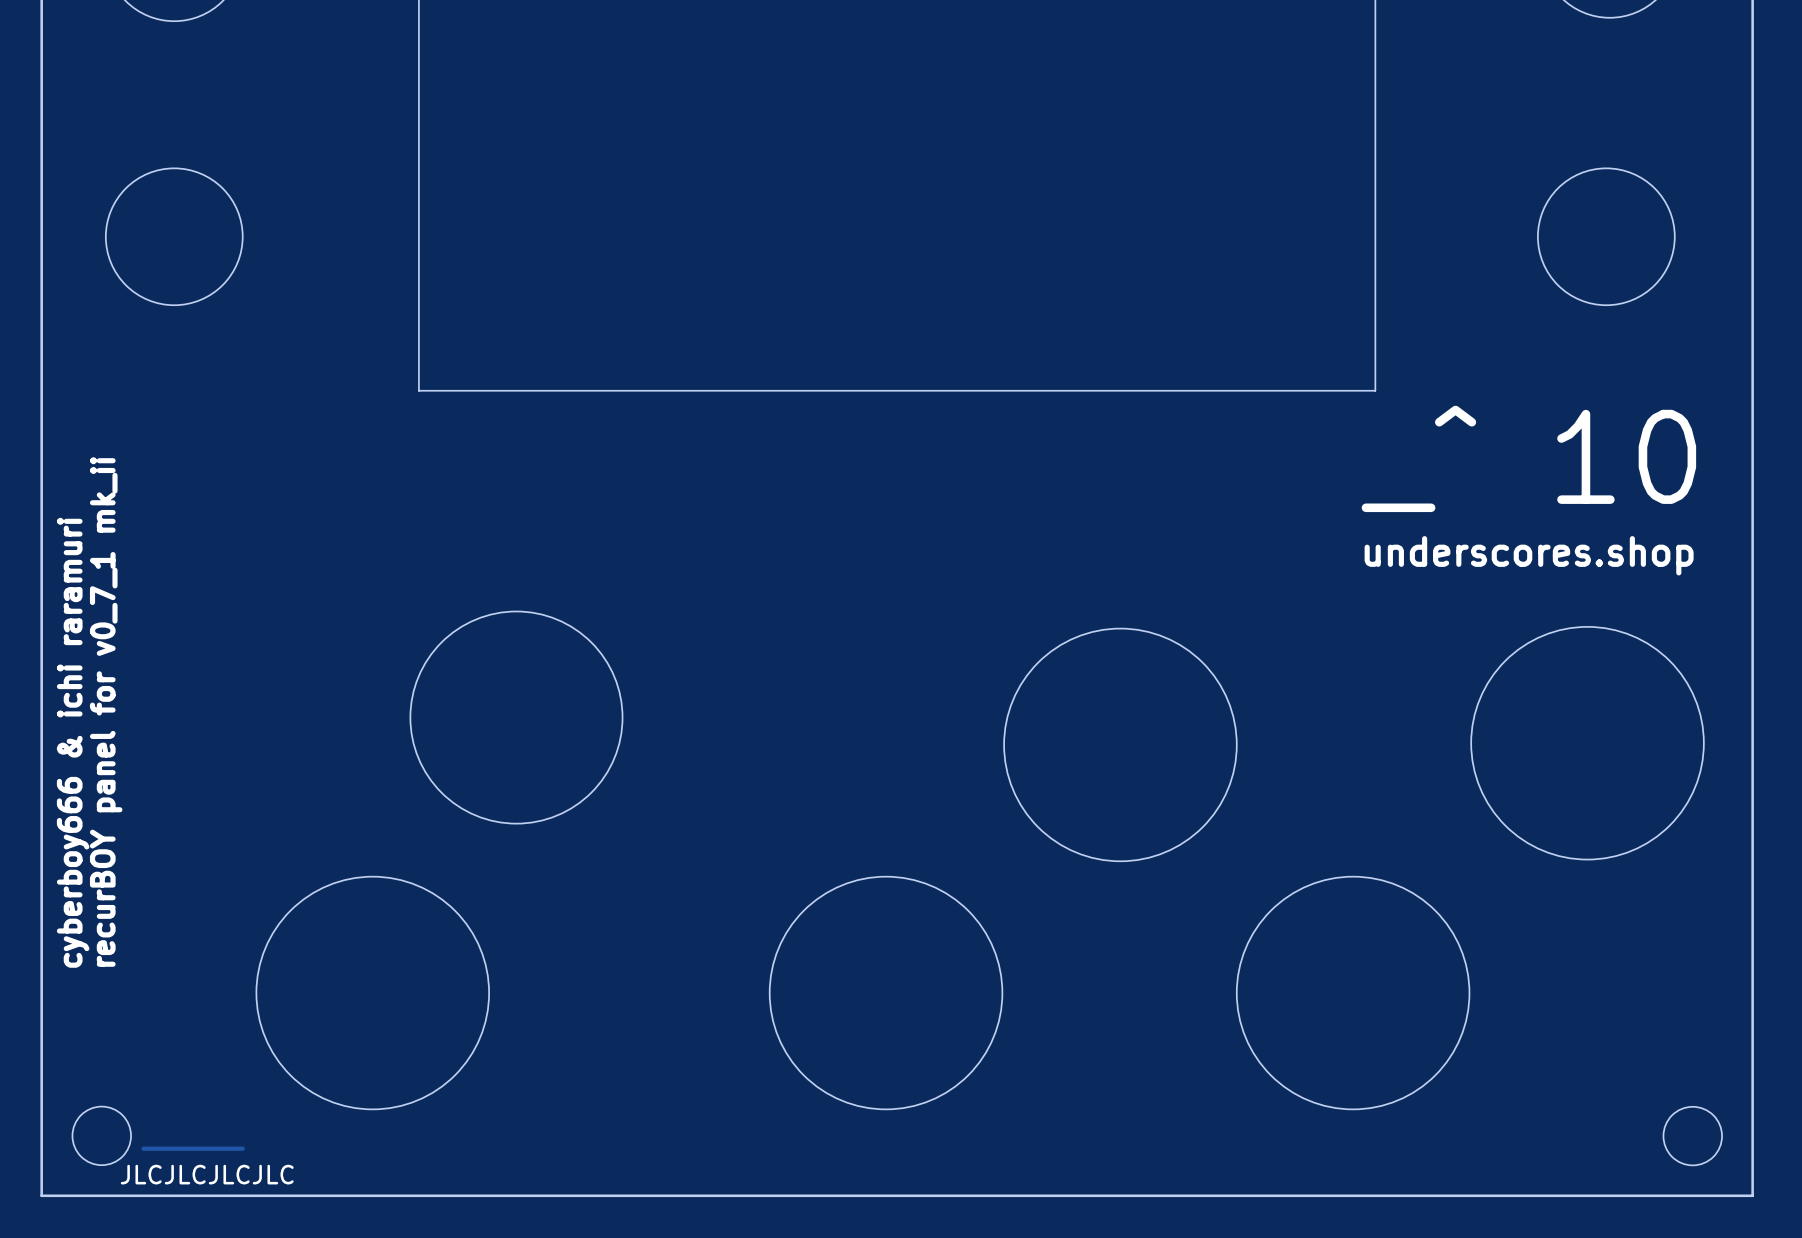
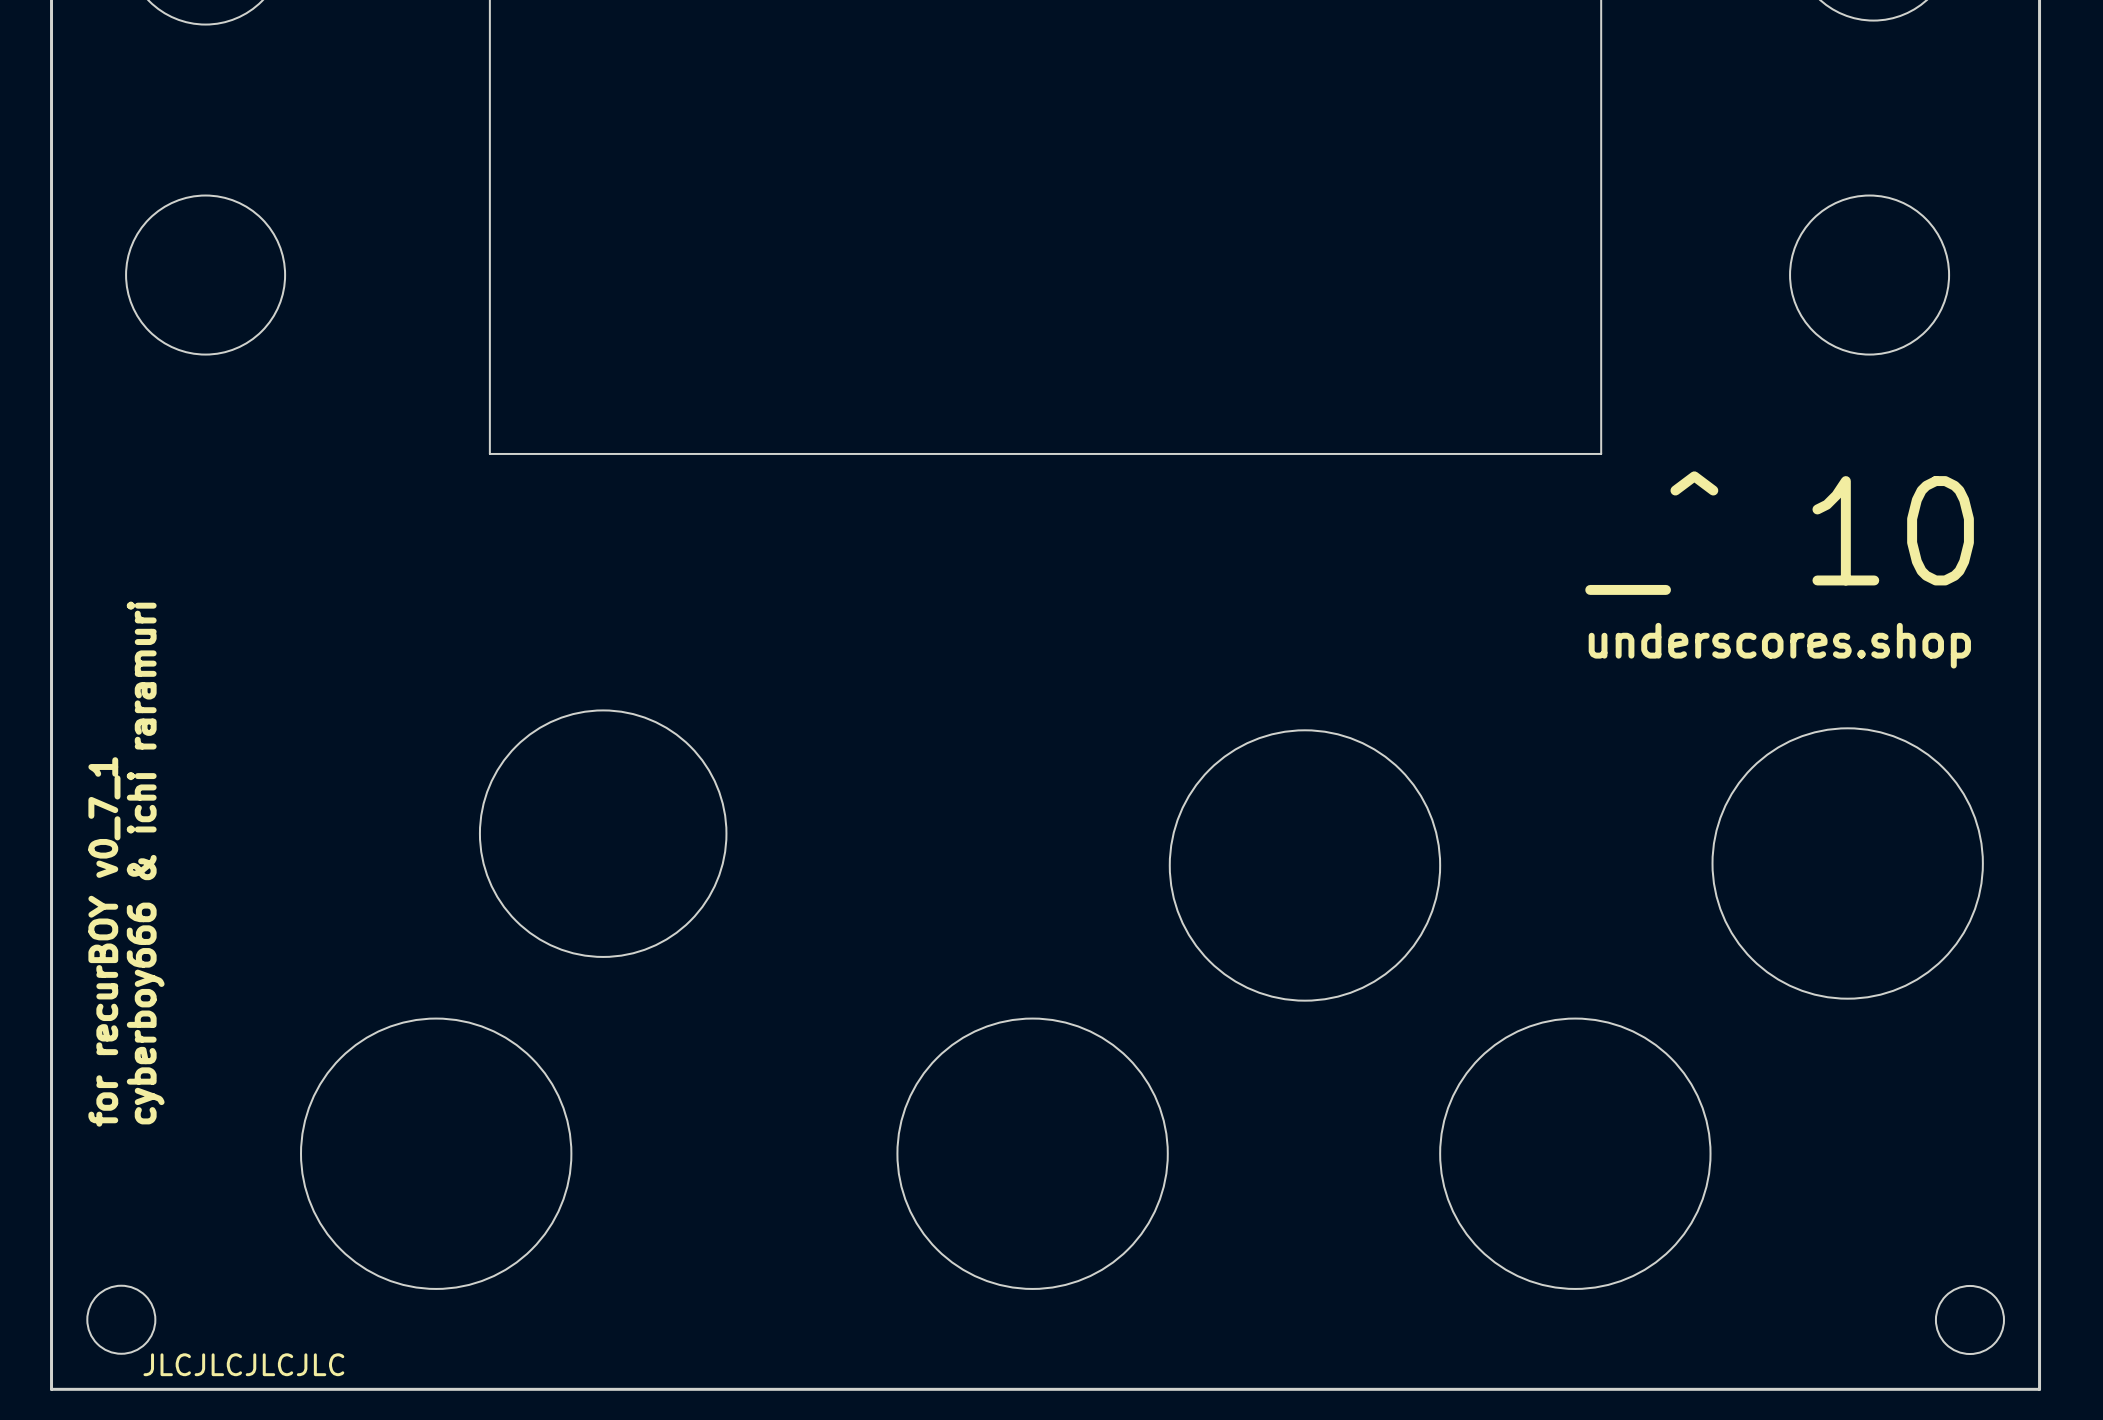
text: recurBOY panel for v0_7_1 mk_ii (106, 711) -> for recurBOY v0_7_1 (104, 941)
text position: cyberboy666 & ichi raramuri (73, 742) -> cyberboy666 & ichi raramuri (145, 862)
track: (242, 1148) (143, 1148) -> none

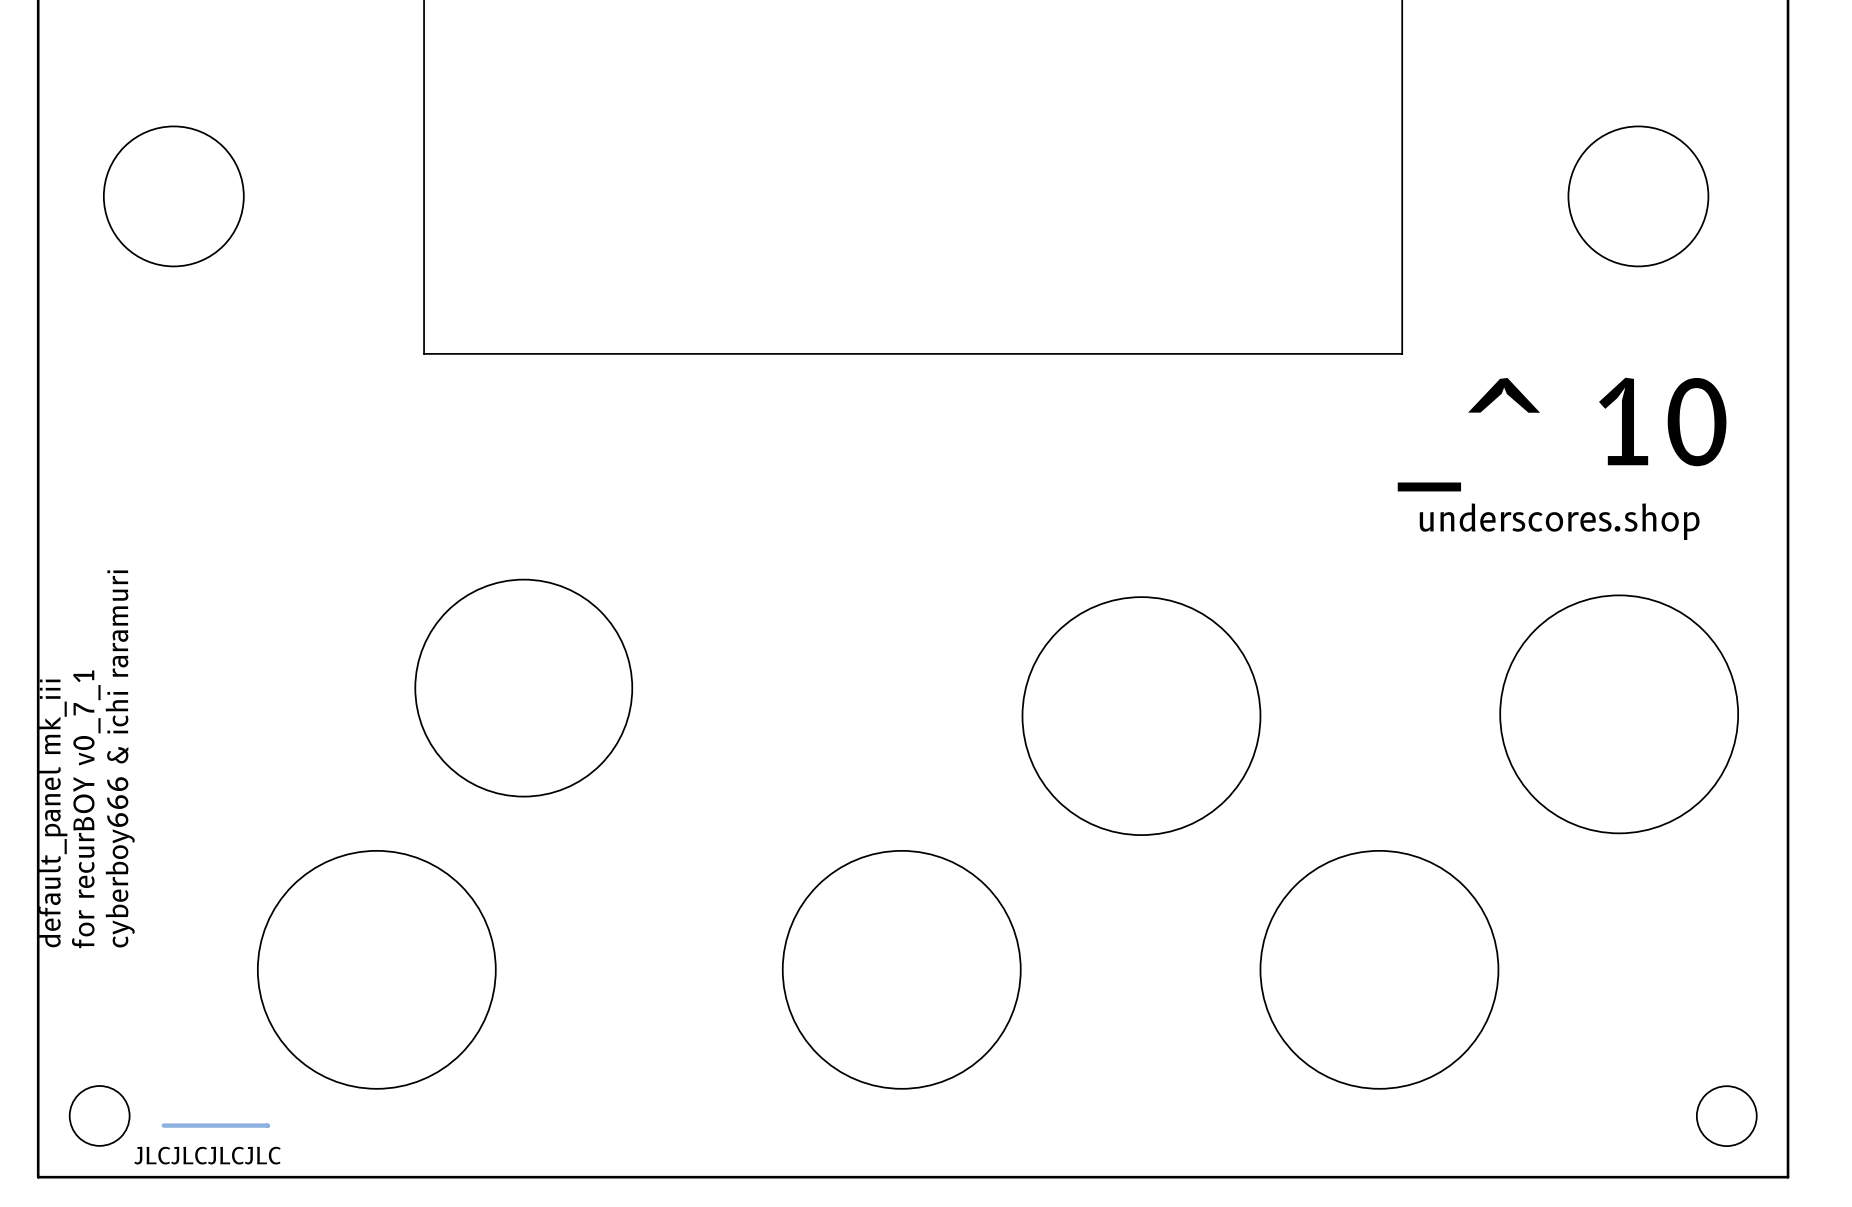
text: none -> default_panel mk_iii (52, 813)
track: none -> (163, 1125) (267, 1126)

